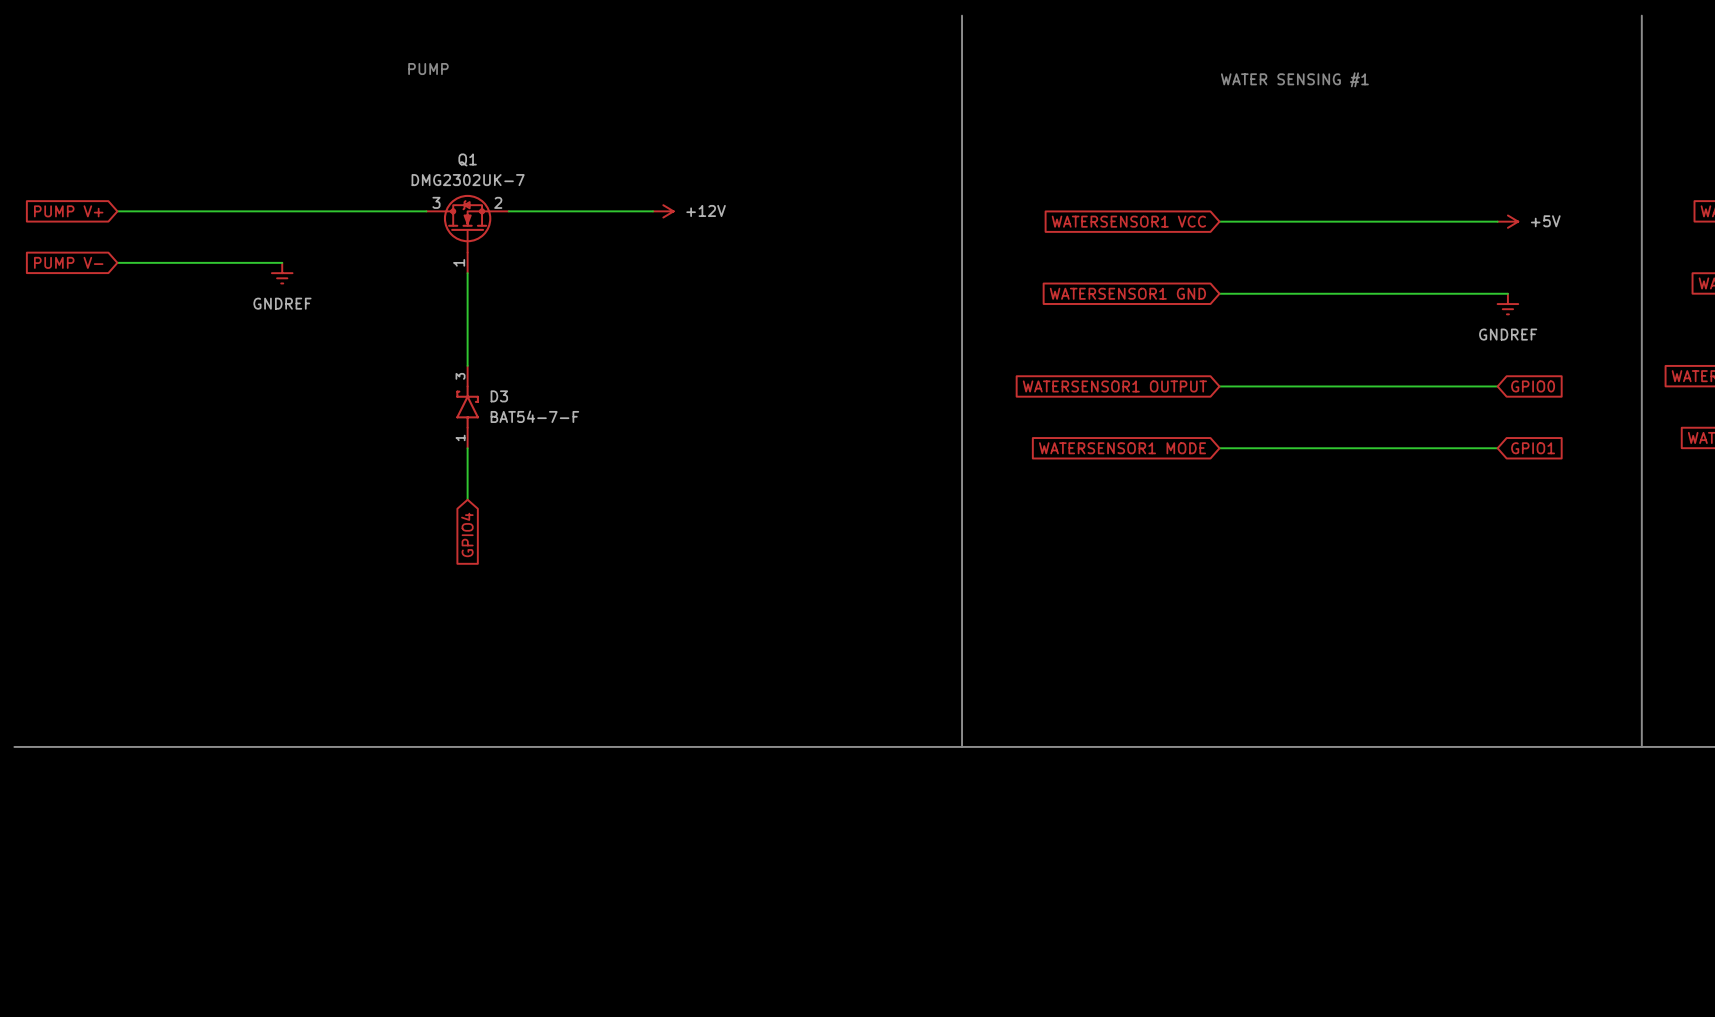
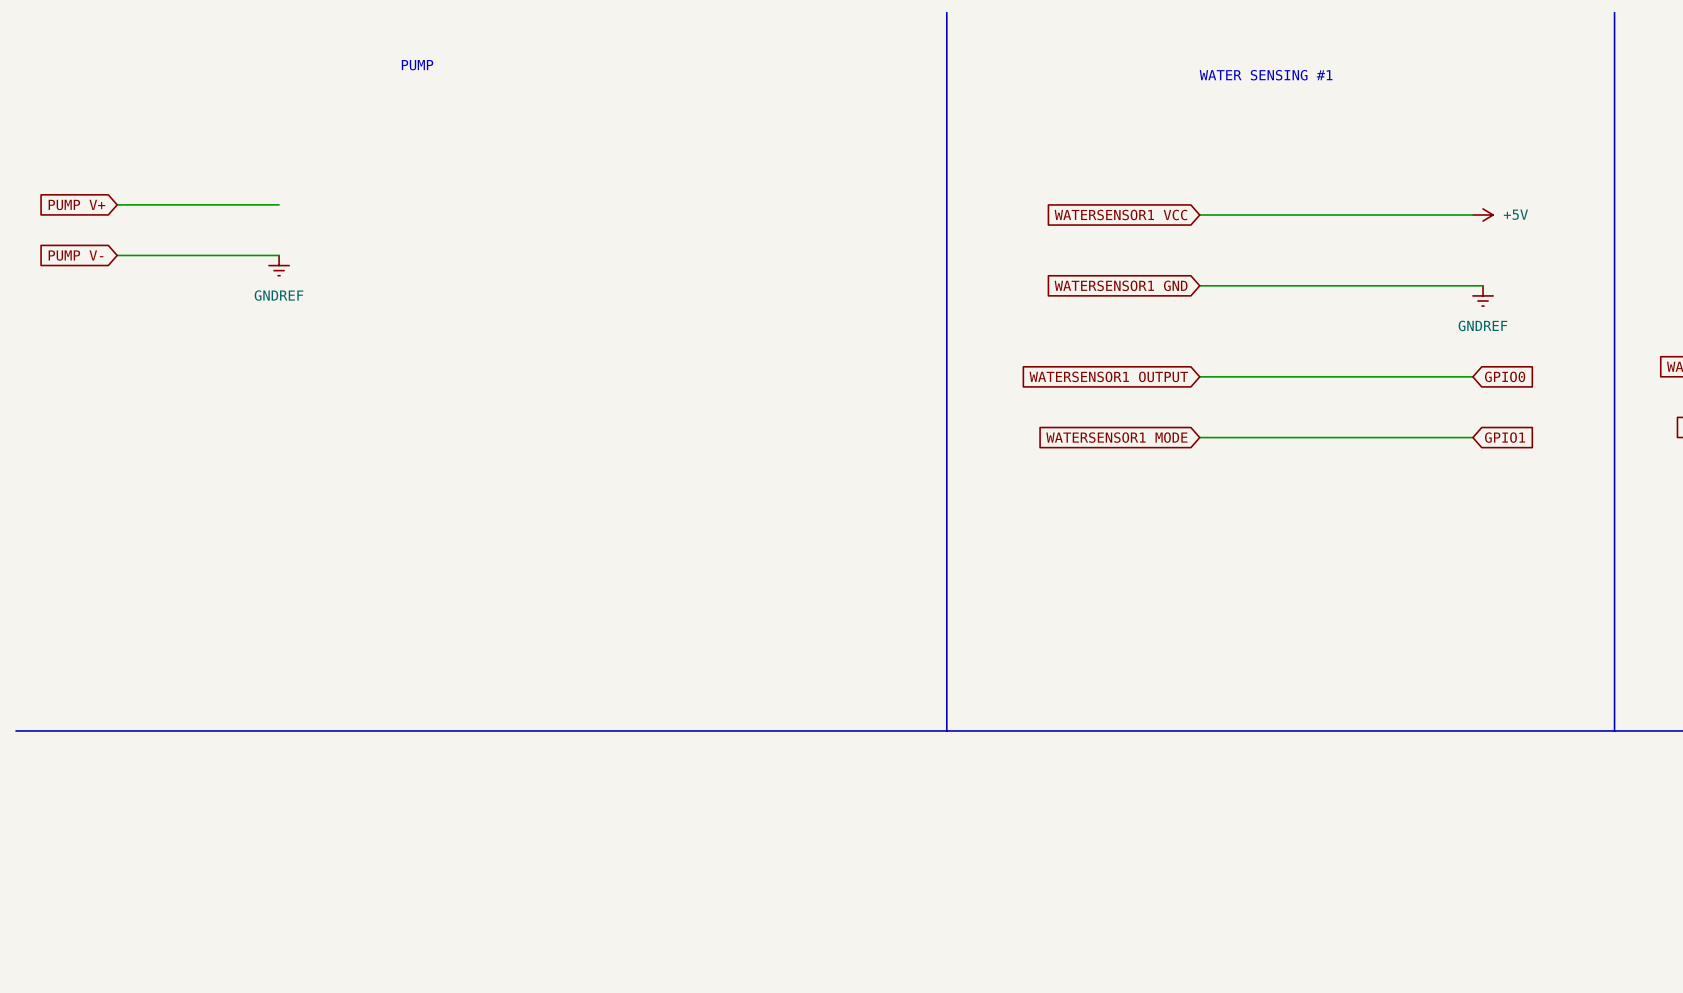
wire: (282, 211) (426, 211) -> none
wire: (508, 211) (653, 211) -> none
power symbol: +12V (663, 211) -> none
Q1: DMG2302UK-7 (467, 234) -> none
wire: (467, 273) (467, 365) -> none
D3: BAT54-7-F (467, 407) -> none
wire: (467, 448) (467, 499) -> none
global label: GPIO4 (467, 534) -> none

